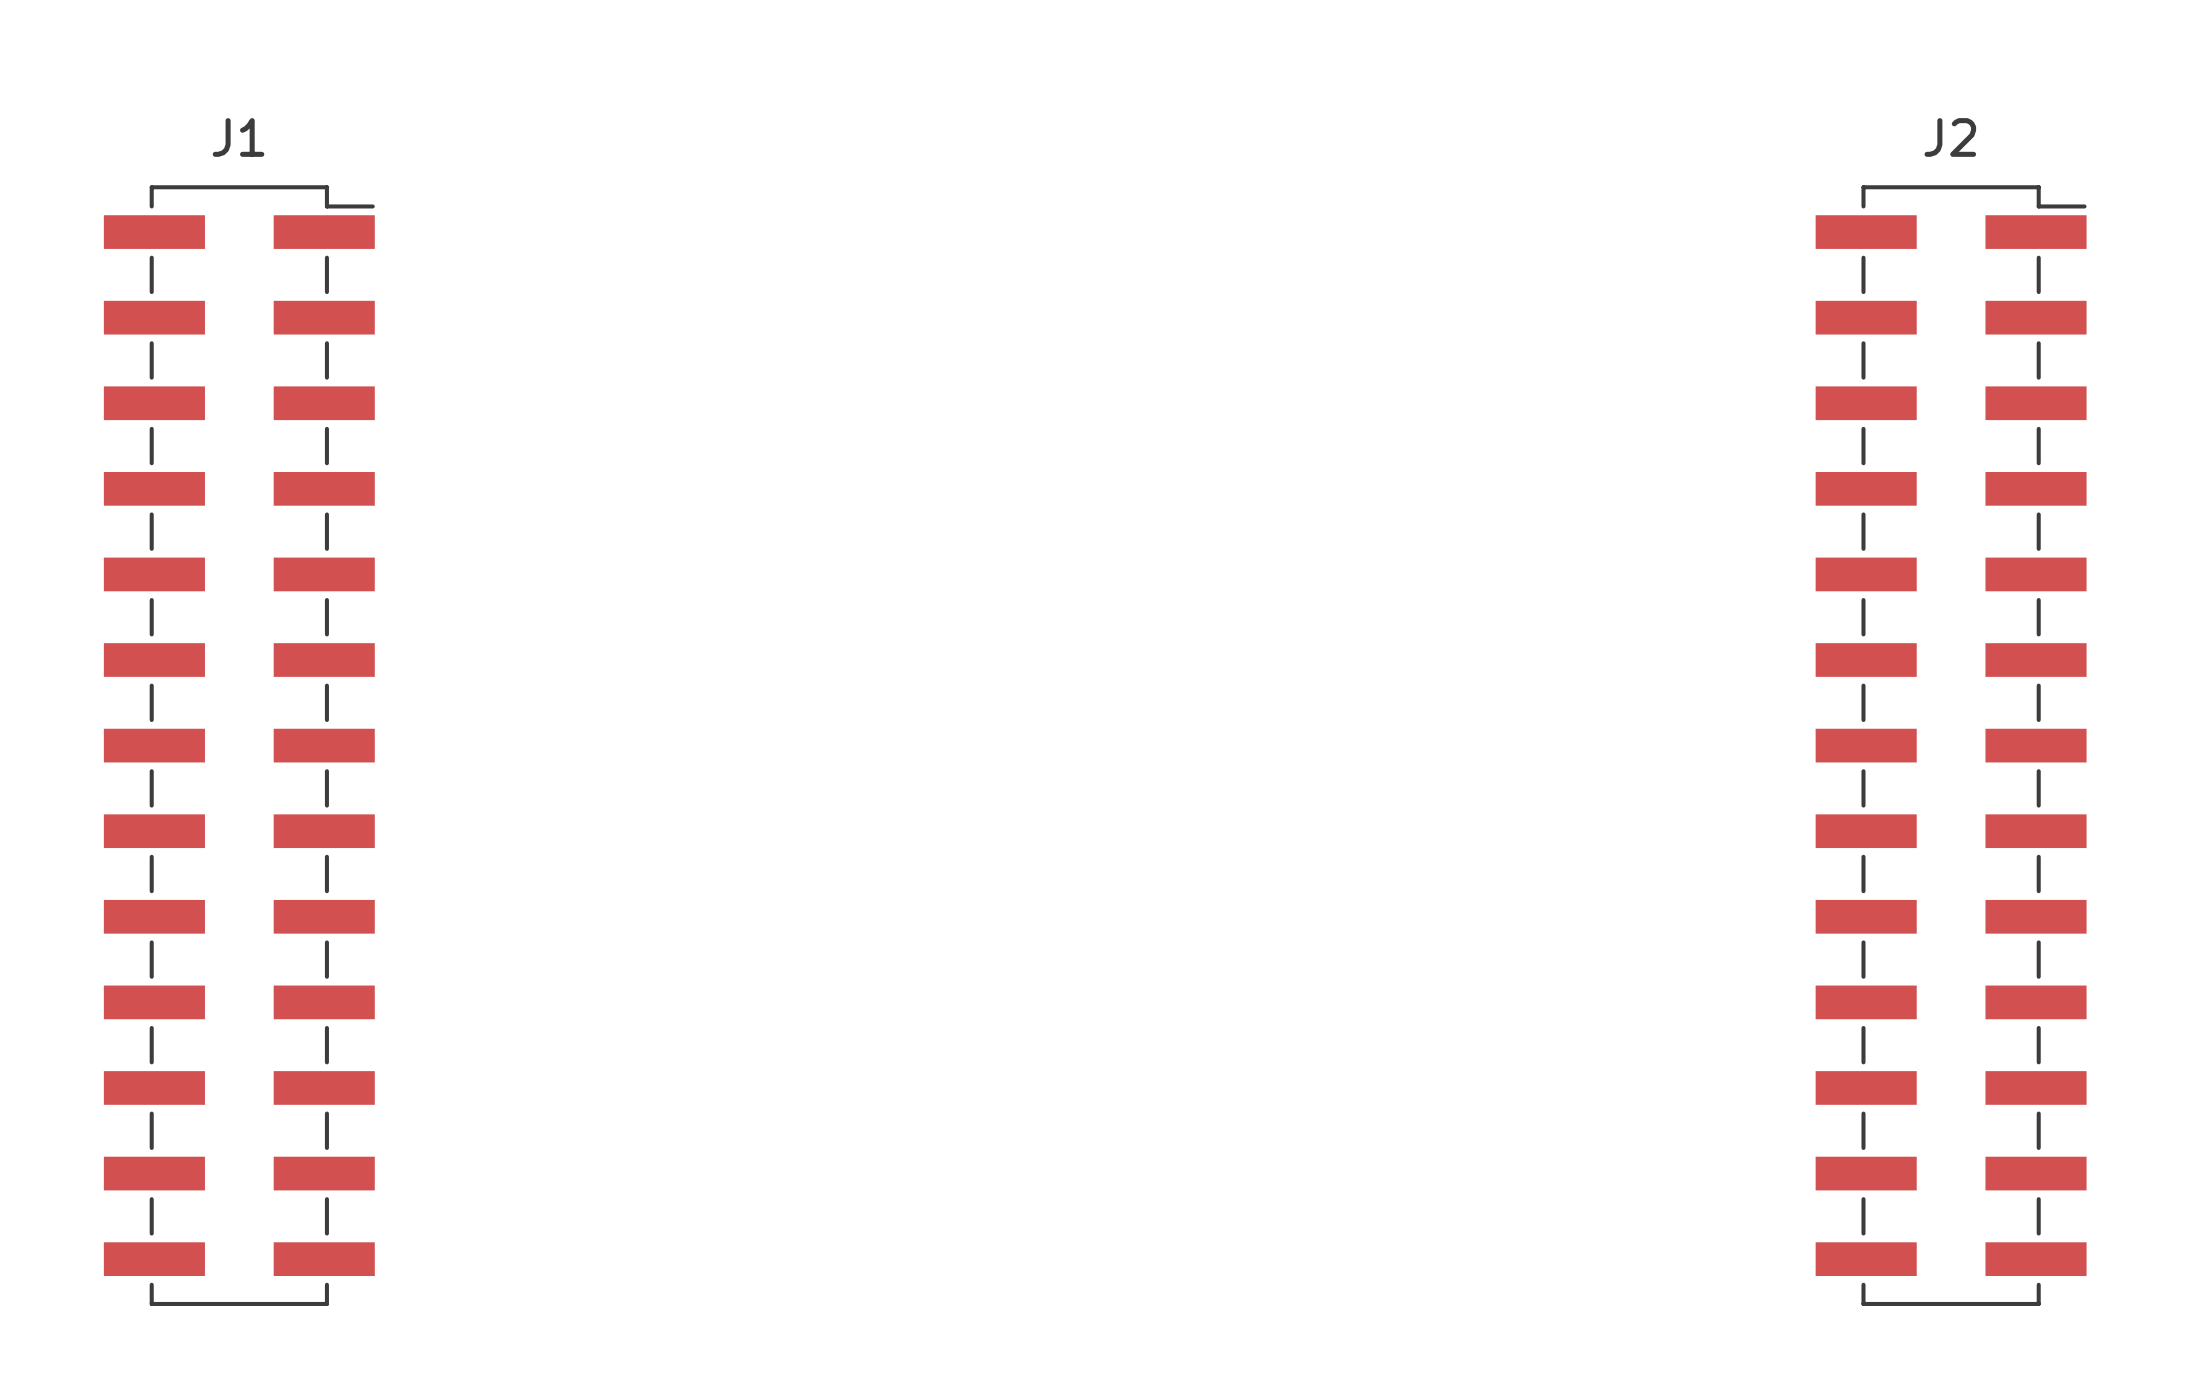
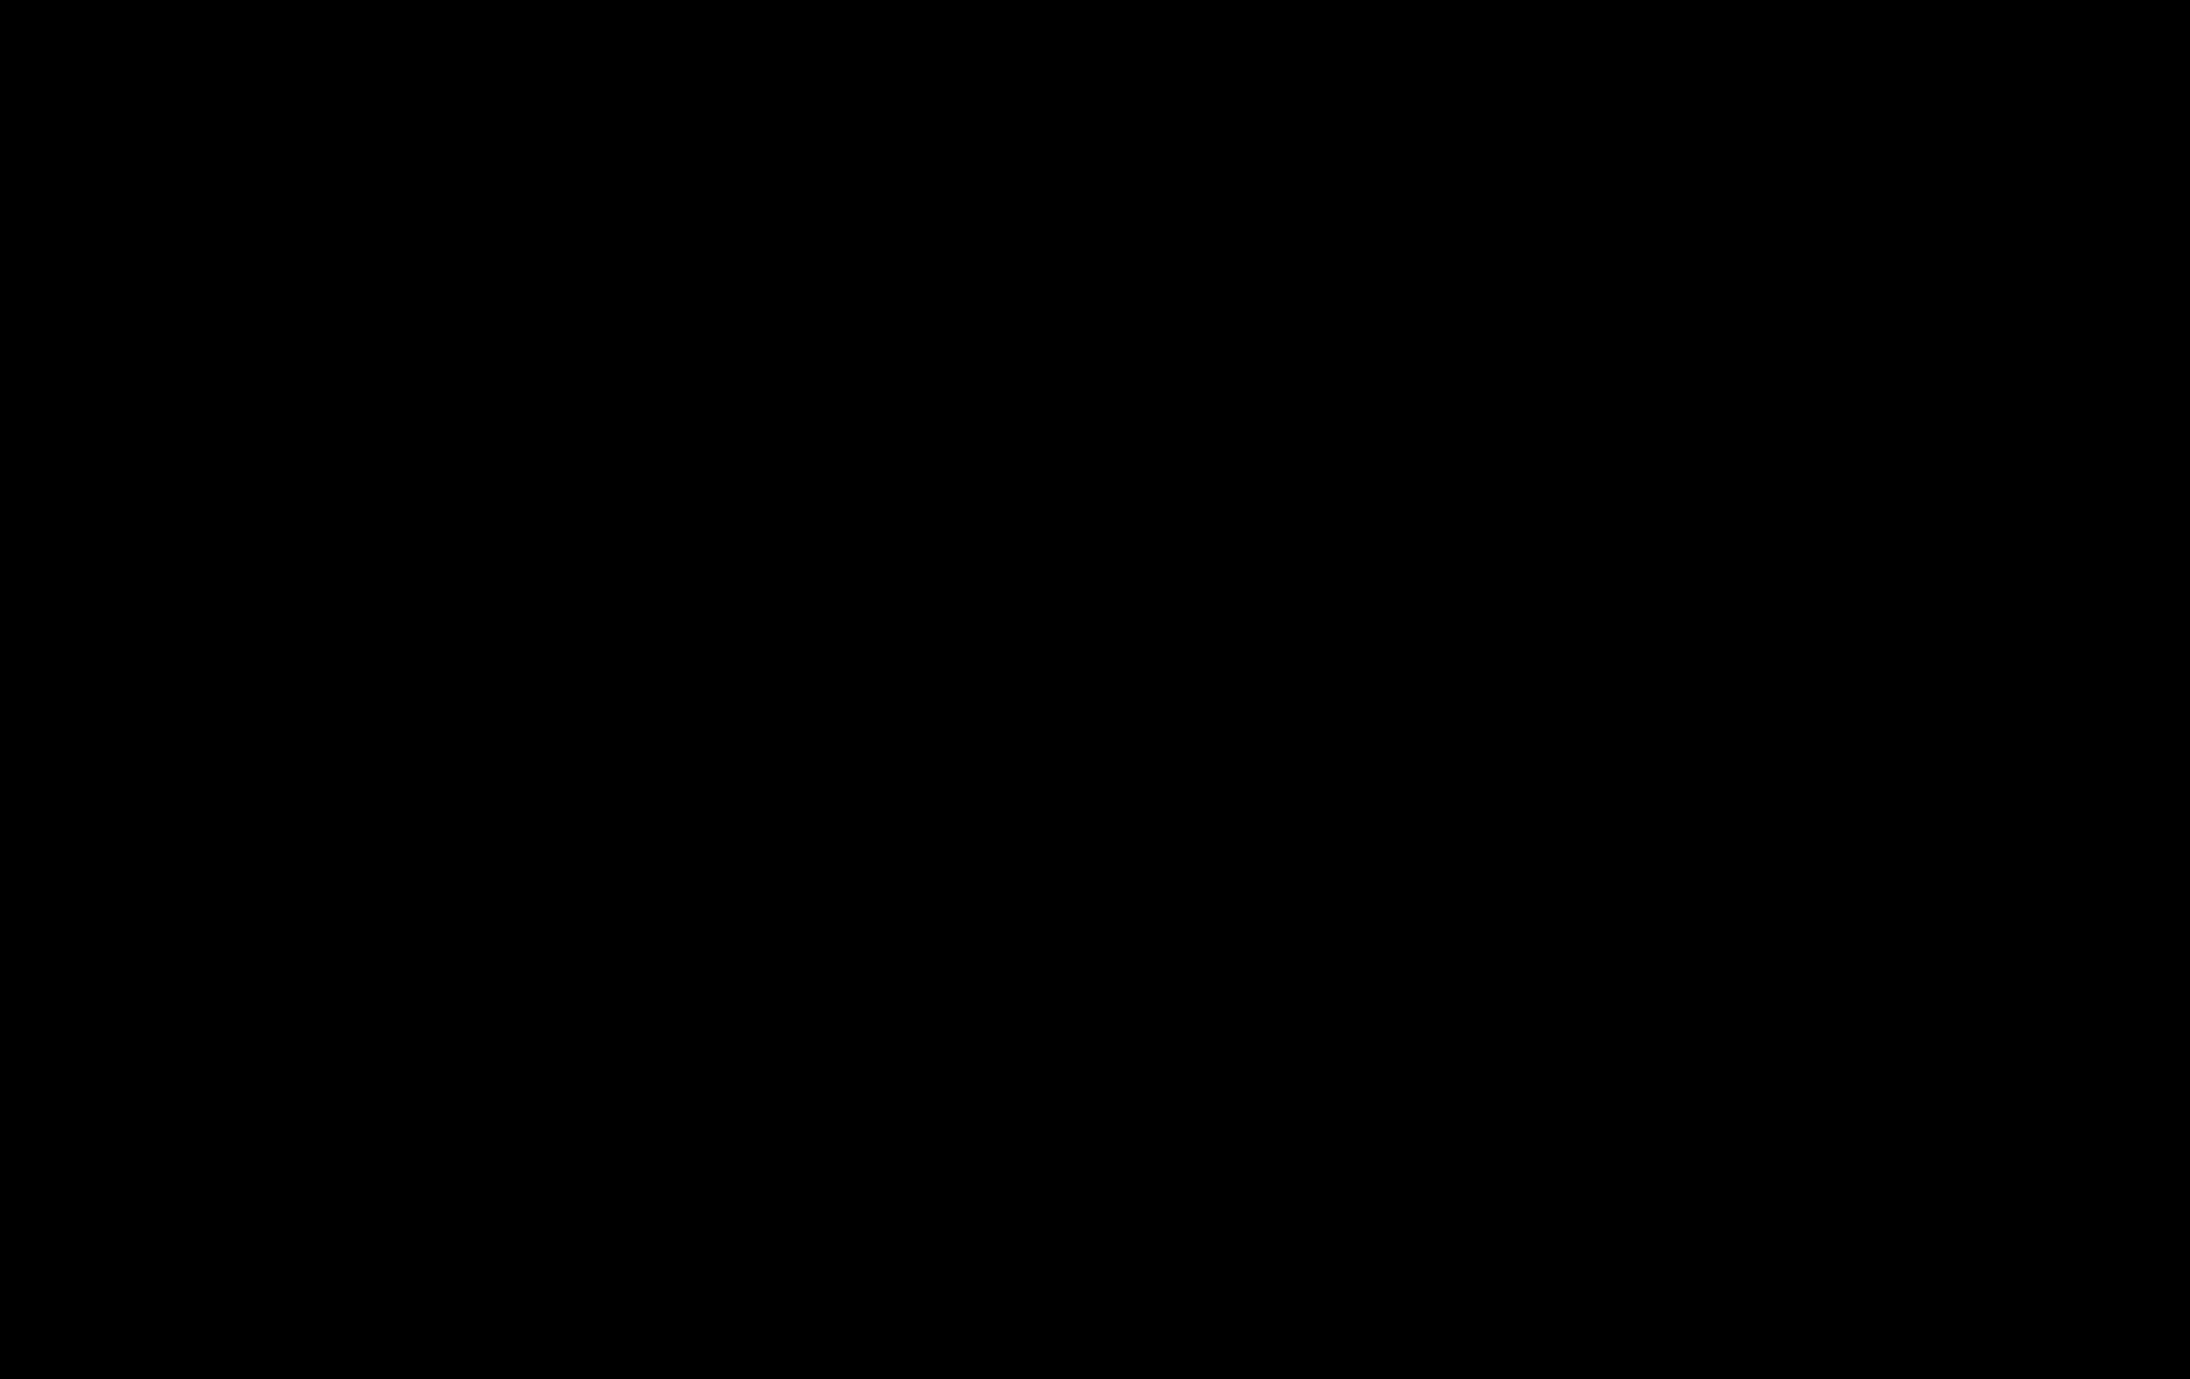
J1: (239, 745) -> none
J2: (1951, 745) -> none

